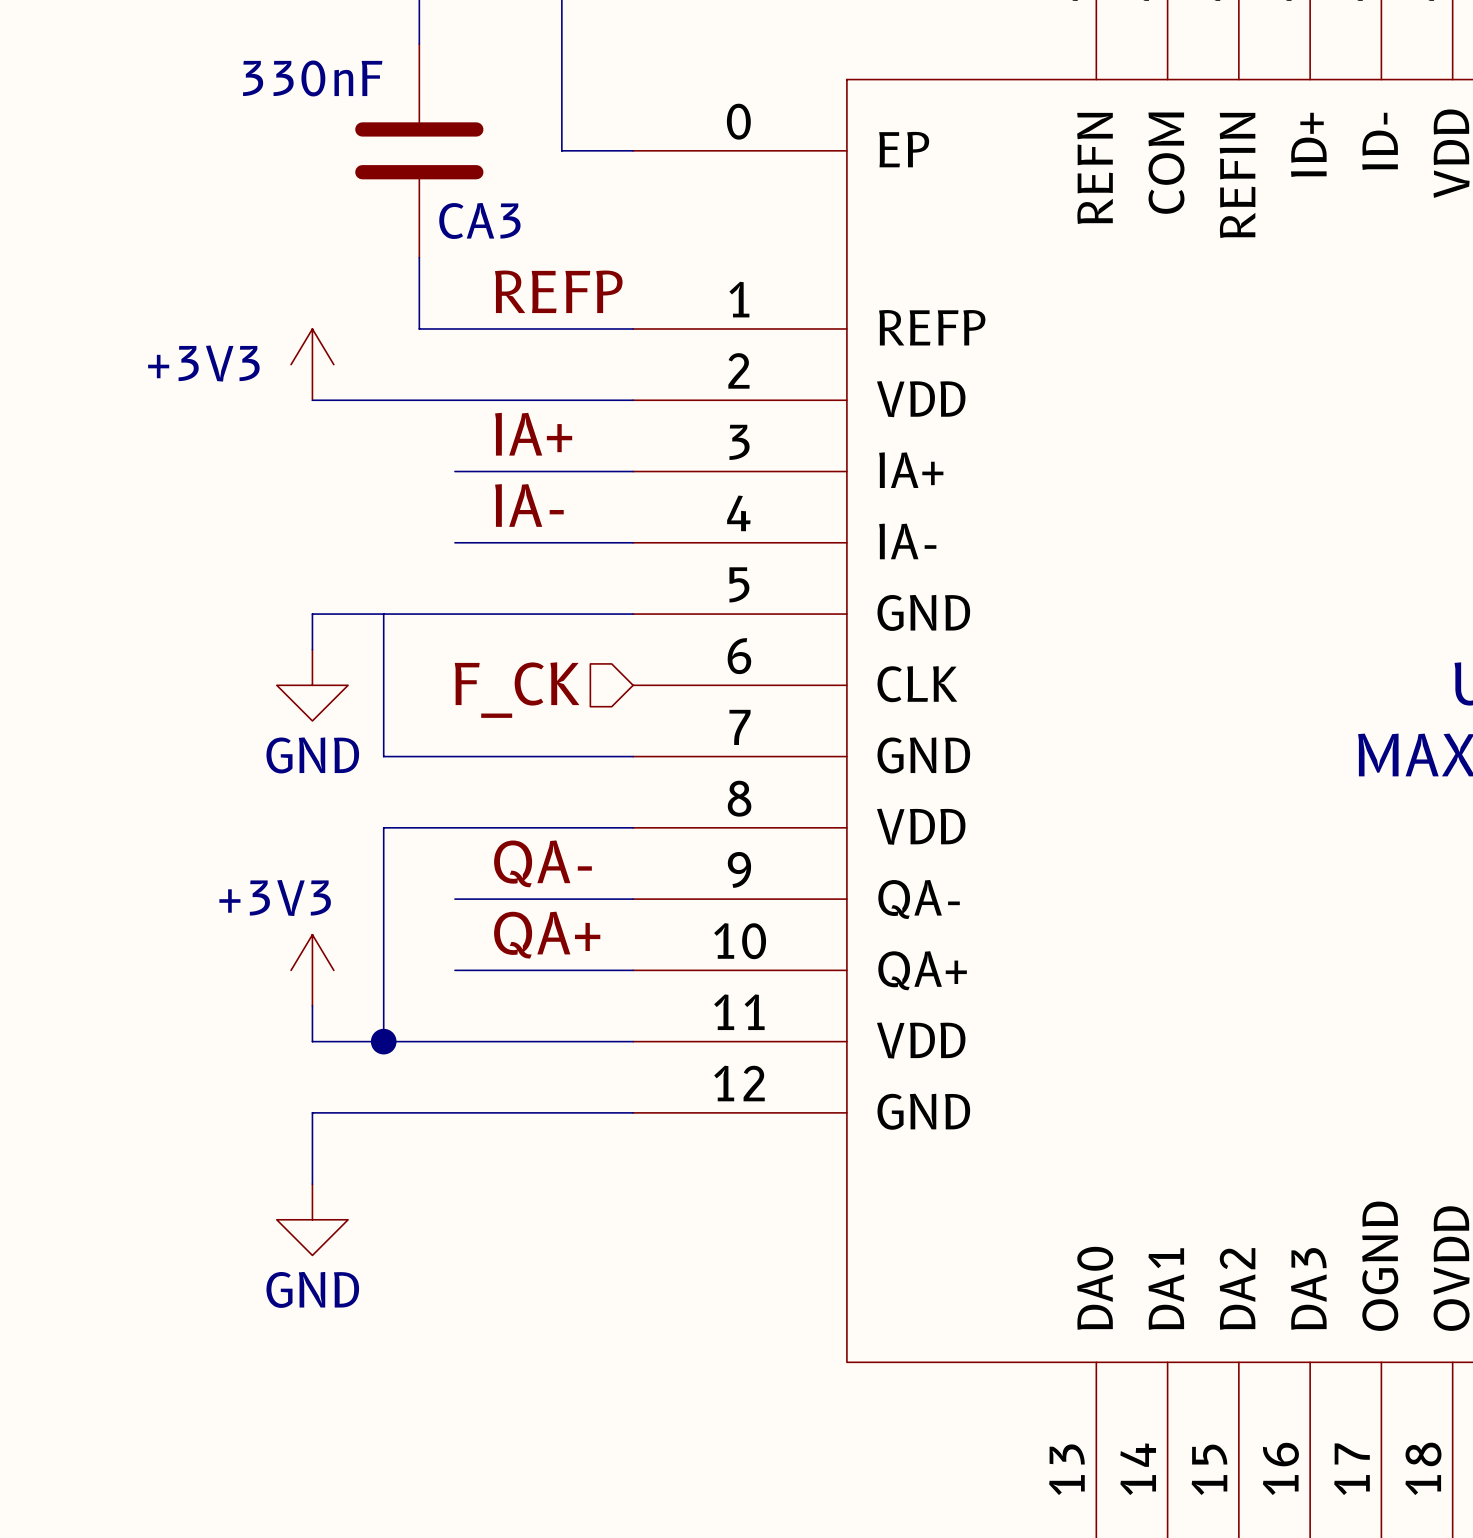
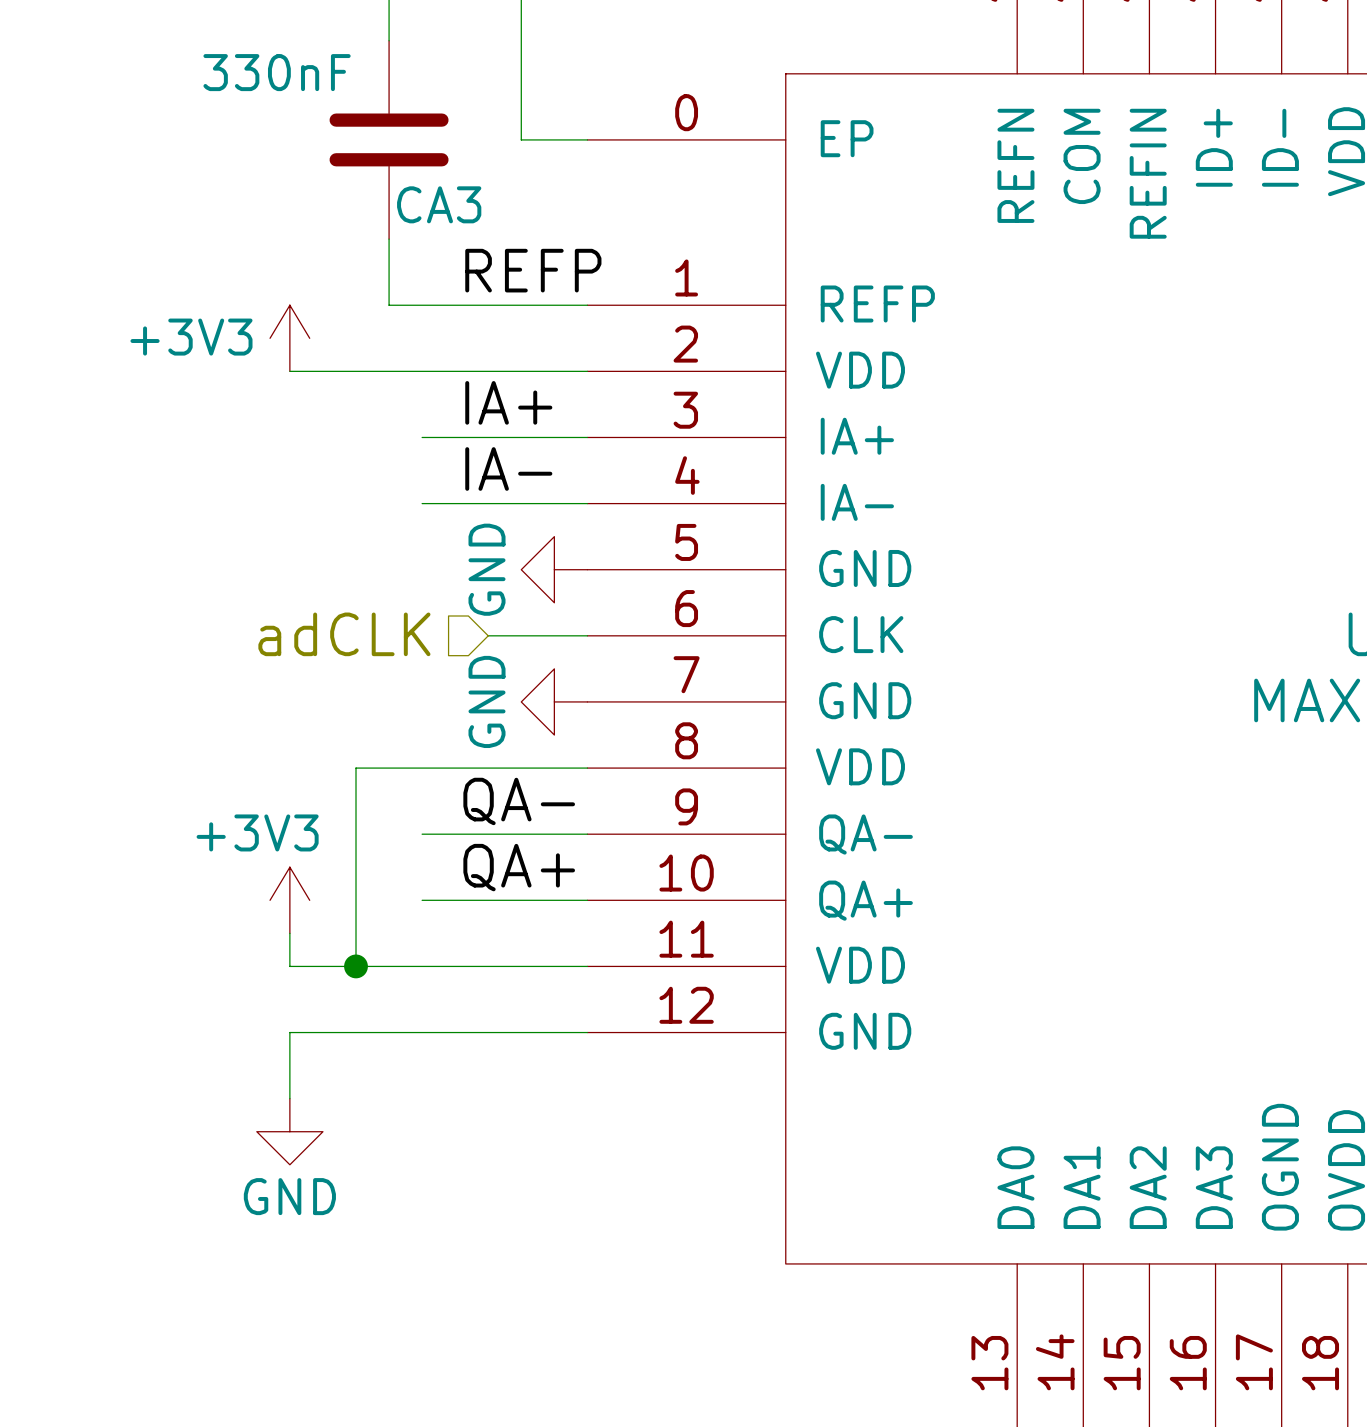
wire: (383, 614) (383, 756) (633, 756) -> none
power symbol: none -> GND (554, 569)
wire: (633, 614) (312, 614) (312, 649) -> none
hierarchical label: none -> adCLK (344, 634)
power symbol: GND (312, 685) -> none
wire: none -> (488, 635) (587, 635)
hierarchical label: F_CK (517, 690) -> none
power symbol: none -> GND (554, 701)

